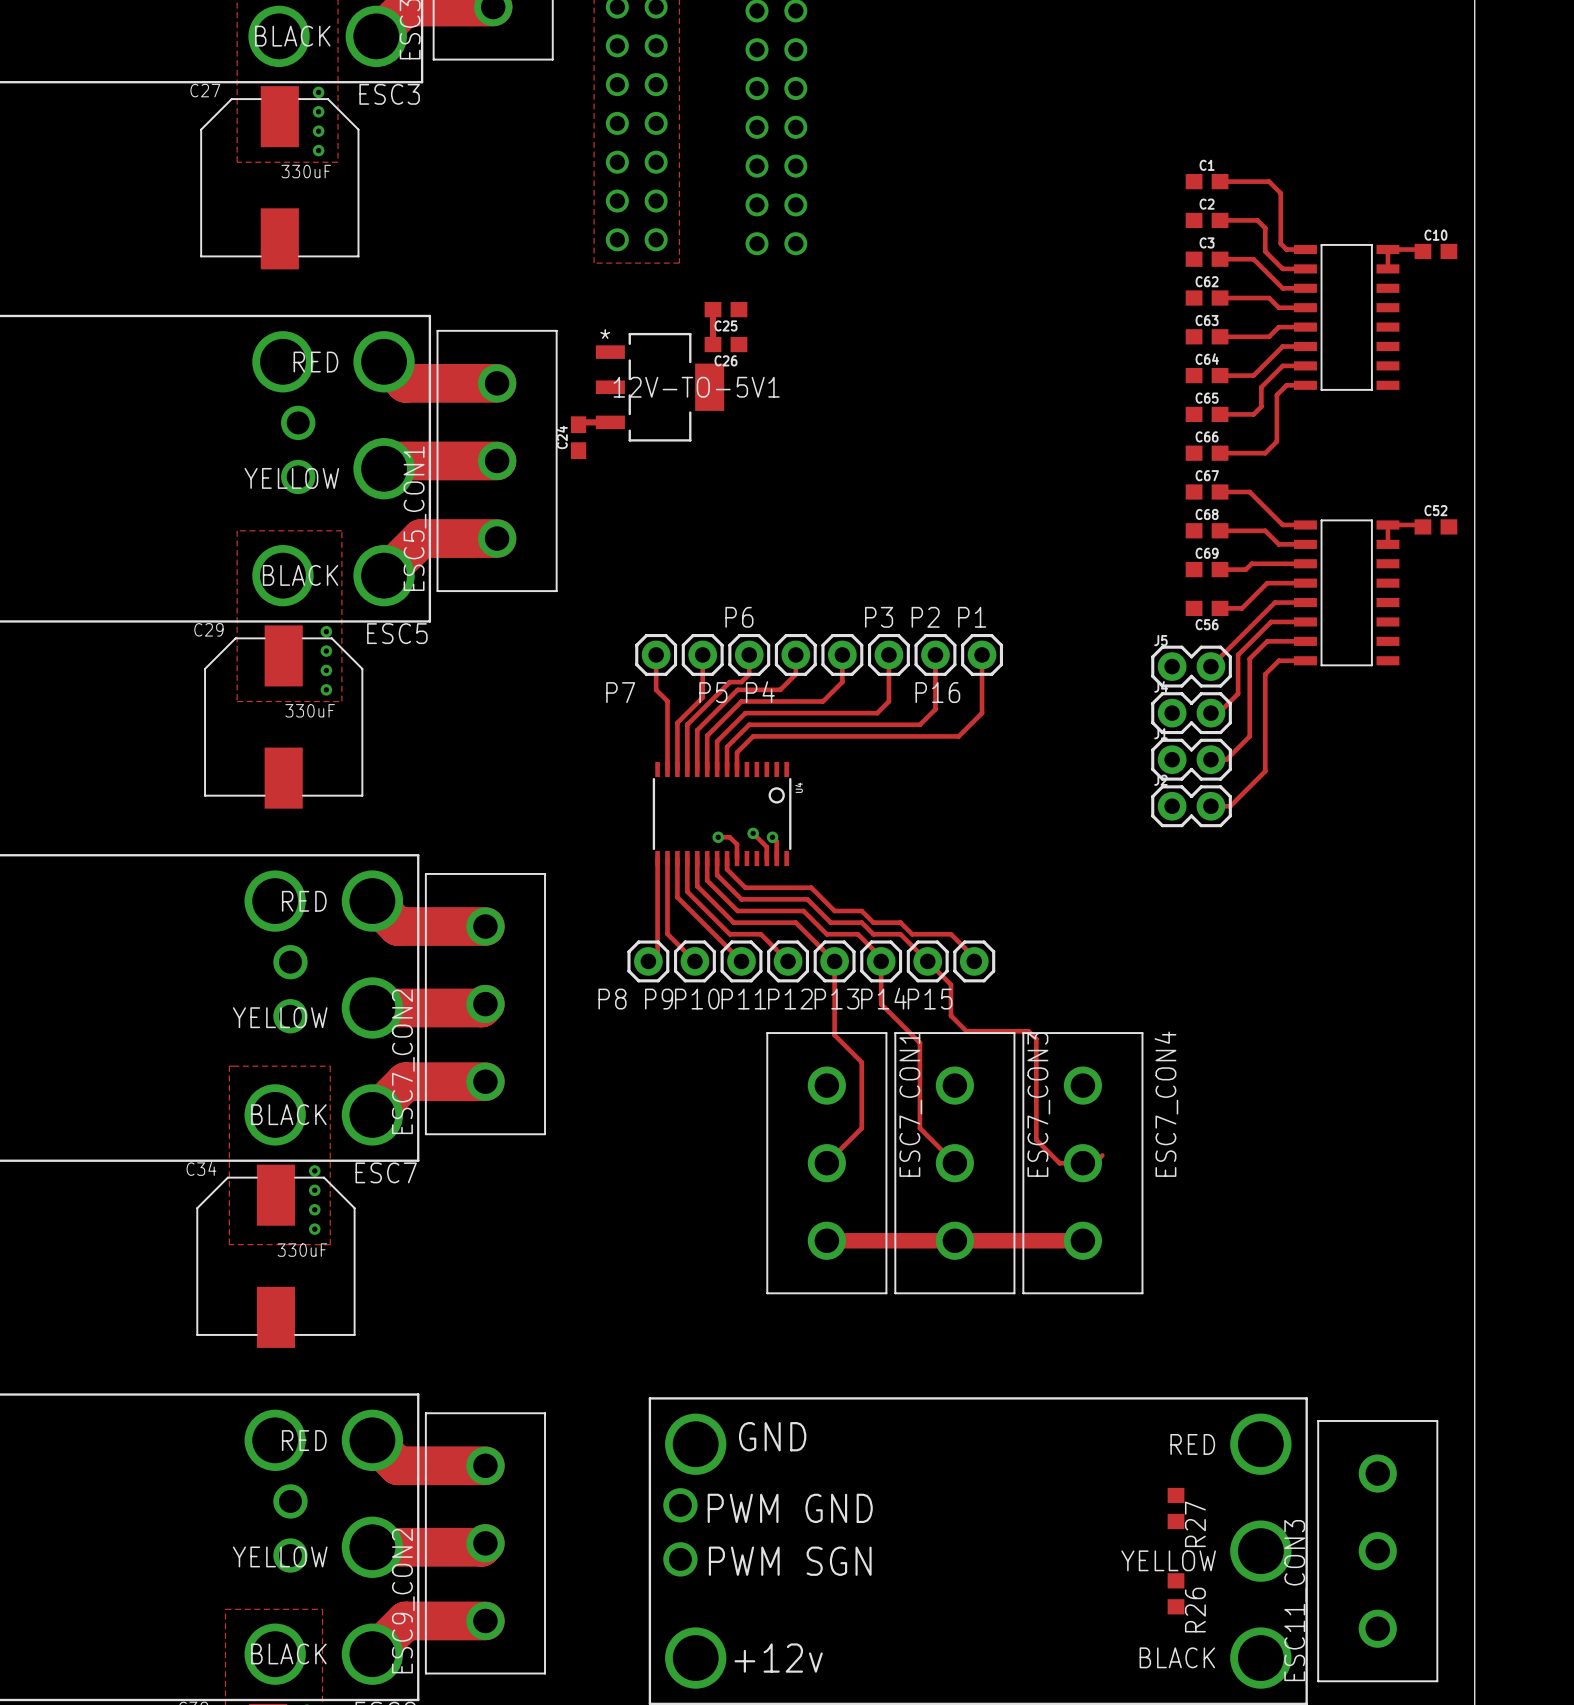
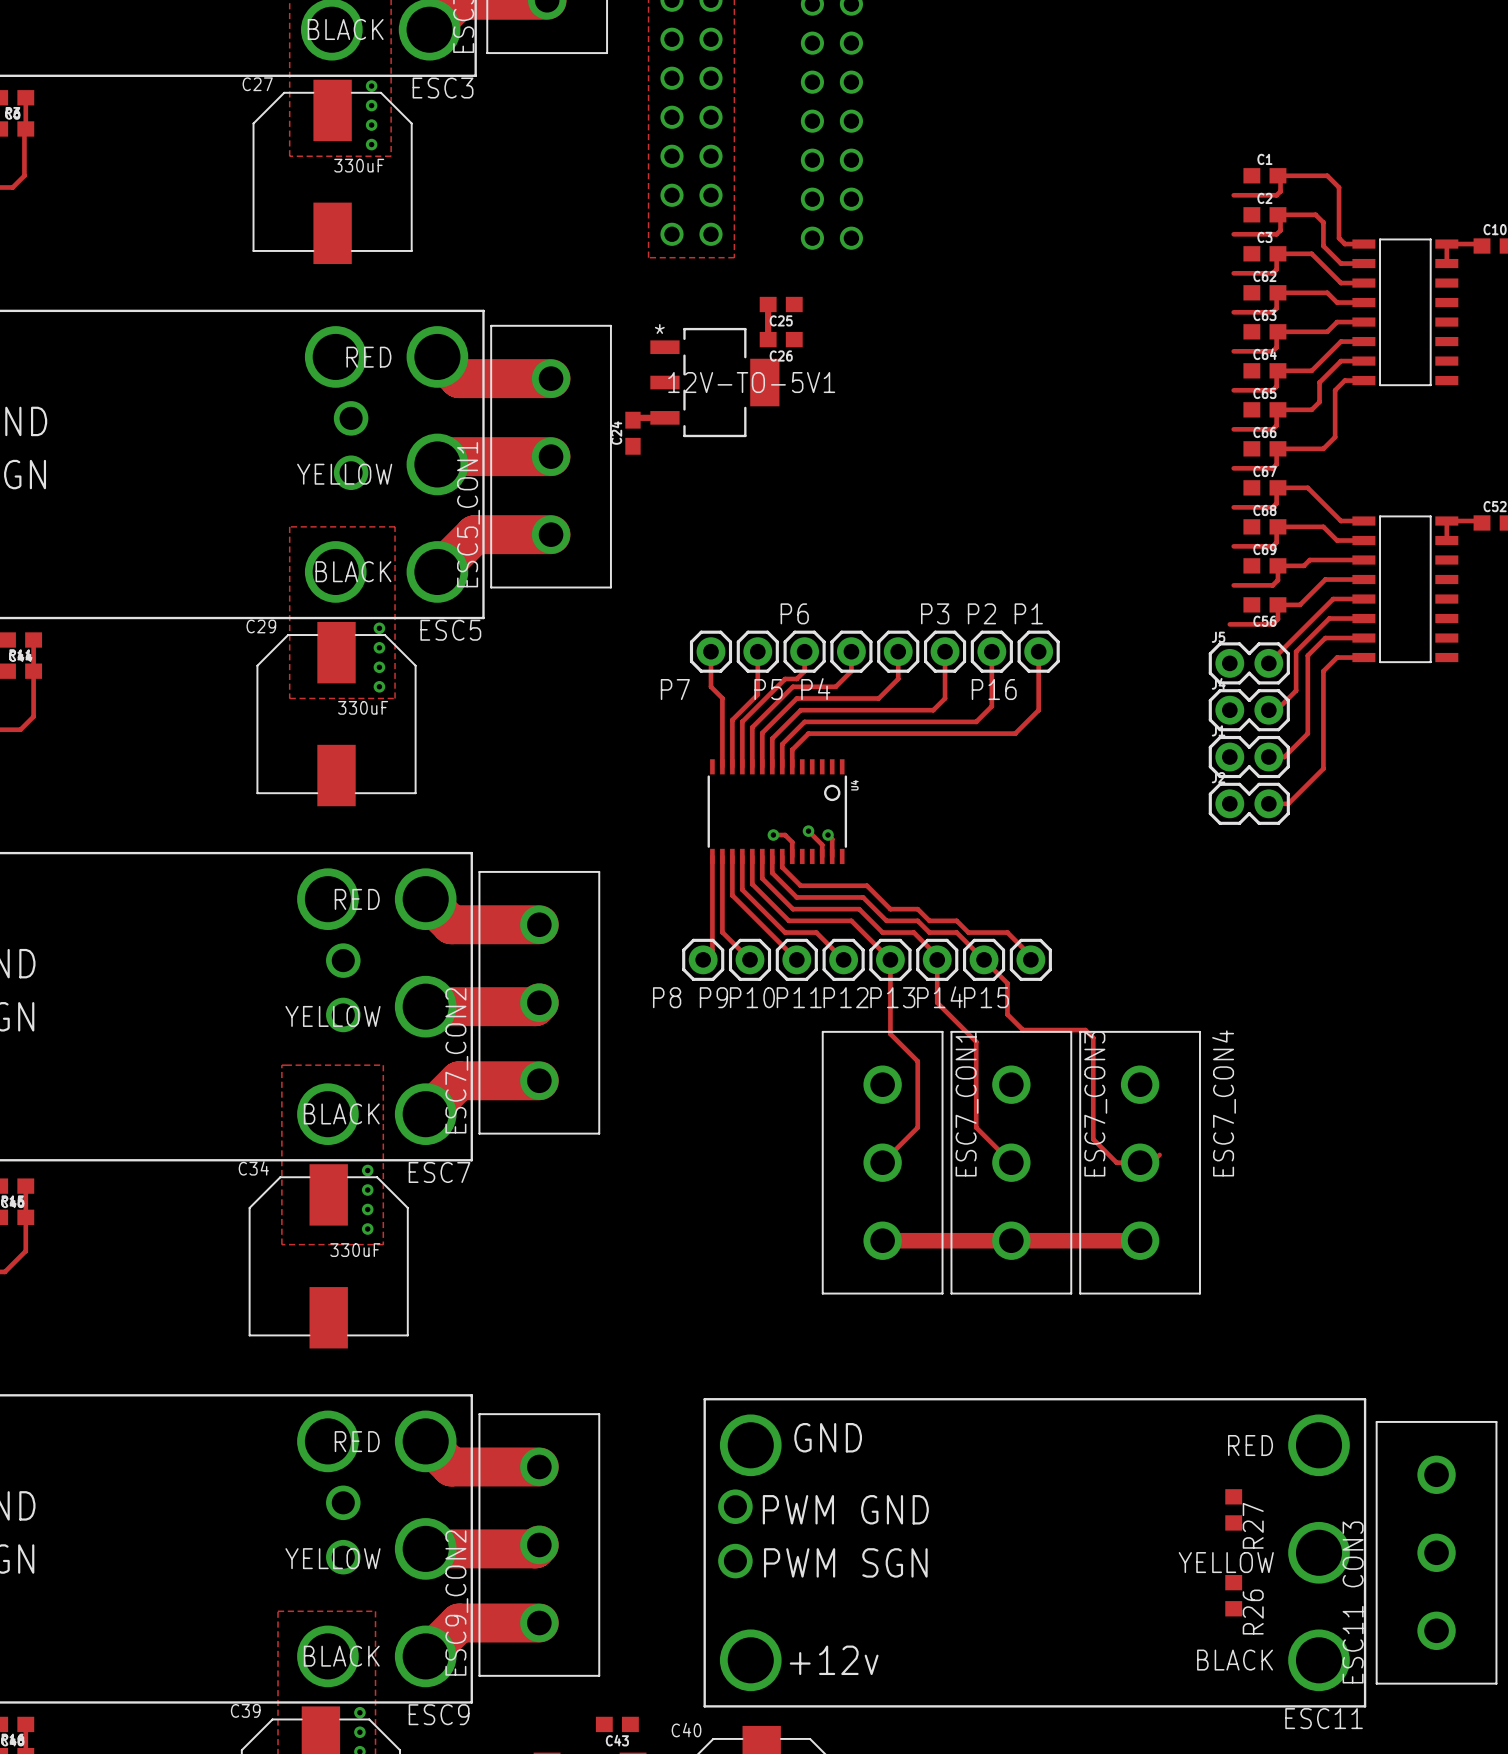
track: none -> (1277, 175) (1280, 178) (1280, 191) (1276, 195) (1233, 195)
track: none -> (1277, 214) (1280, 217) (1280, 230) (1276, 234) (1233, 234)
track: none -> (1277, 253) (1276, 269) (1272, 273) (1233, 273)
track: none -> (1277, 292) (1276, 308) (1272, 312) (1233, 312)
track: none -> (1277, 331) (1276, 347) (1272, 351) (1233, 351)
track: none -> (1277, 370) (1276, 386) (1272, 390) (1233, 390)
track: none -> (1277, 409) (1276, 425) (1272, 429) (1233, 429)
track: none -> (1277, 448) (1276, 464) (1272, 468) (1233, 468)
track: none -> (1277, 487) (1276, 503) (1272, 507) (1233, 507)
track: none -> (1277, 526) (1276, 542) (1272, 546) (1233, 546)
track: none -> (1277, 565) (1277, 580) (1272, 585) (1233, 585)
track: none -> (1277, 604) (1277, 619) (1272, 624) (1229, 624)

